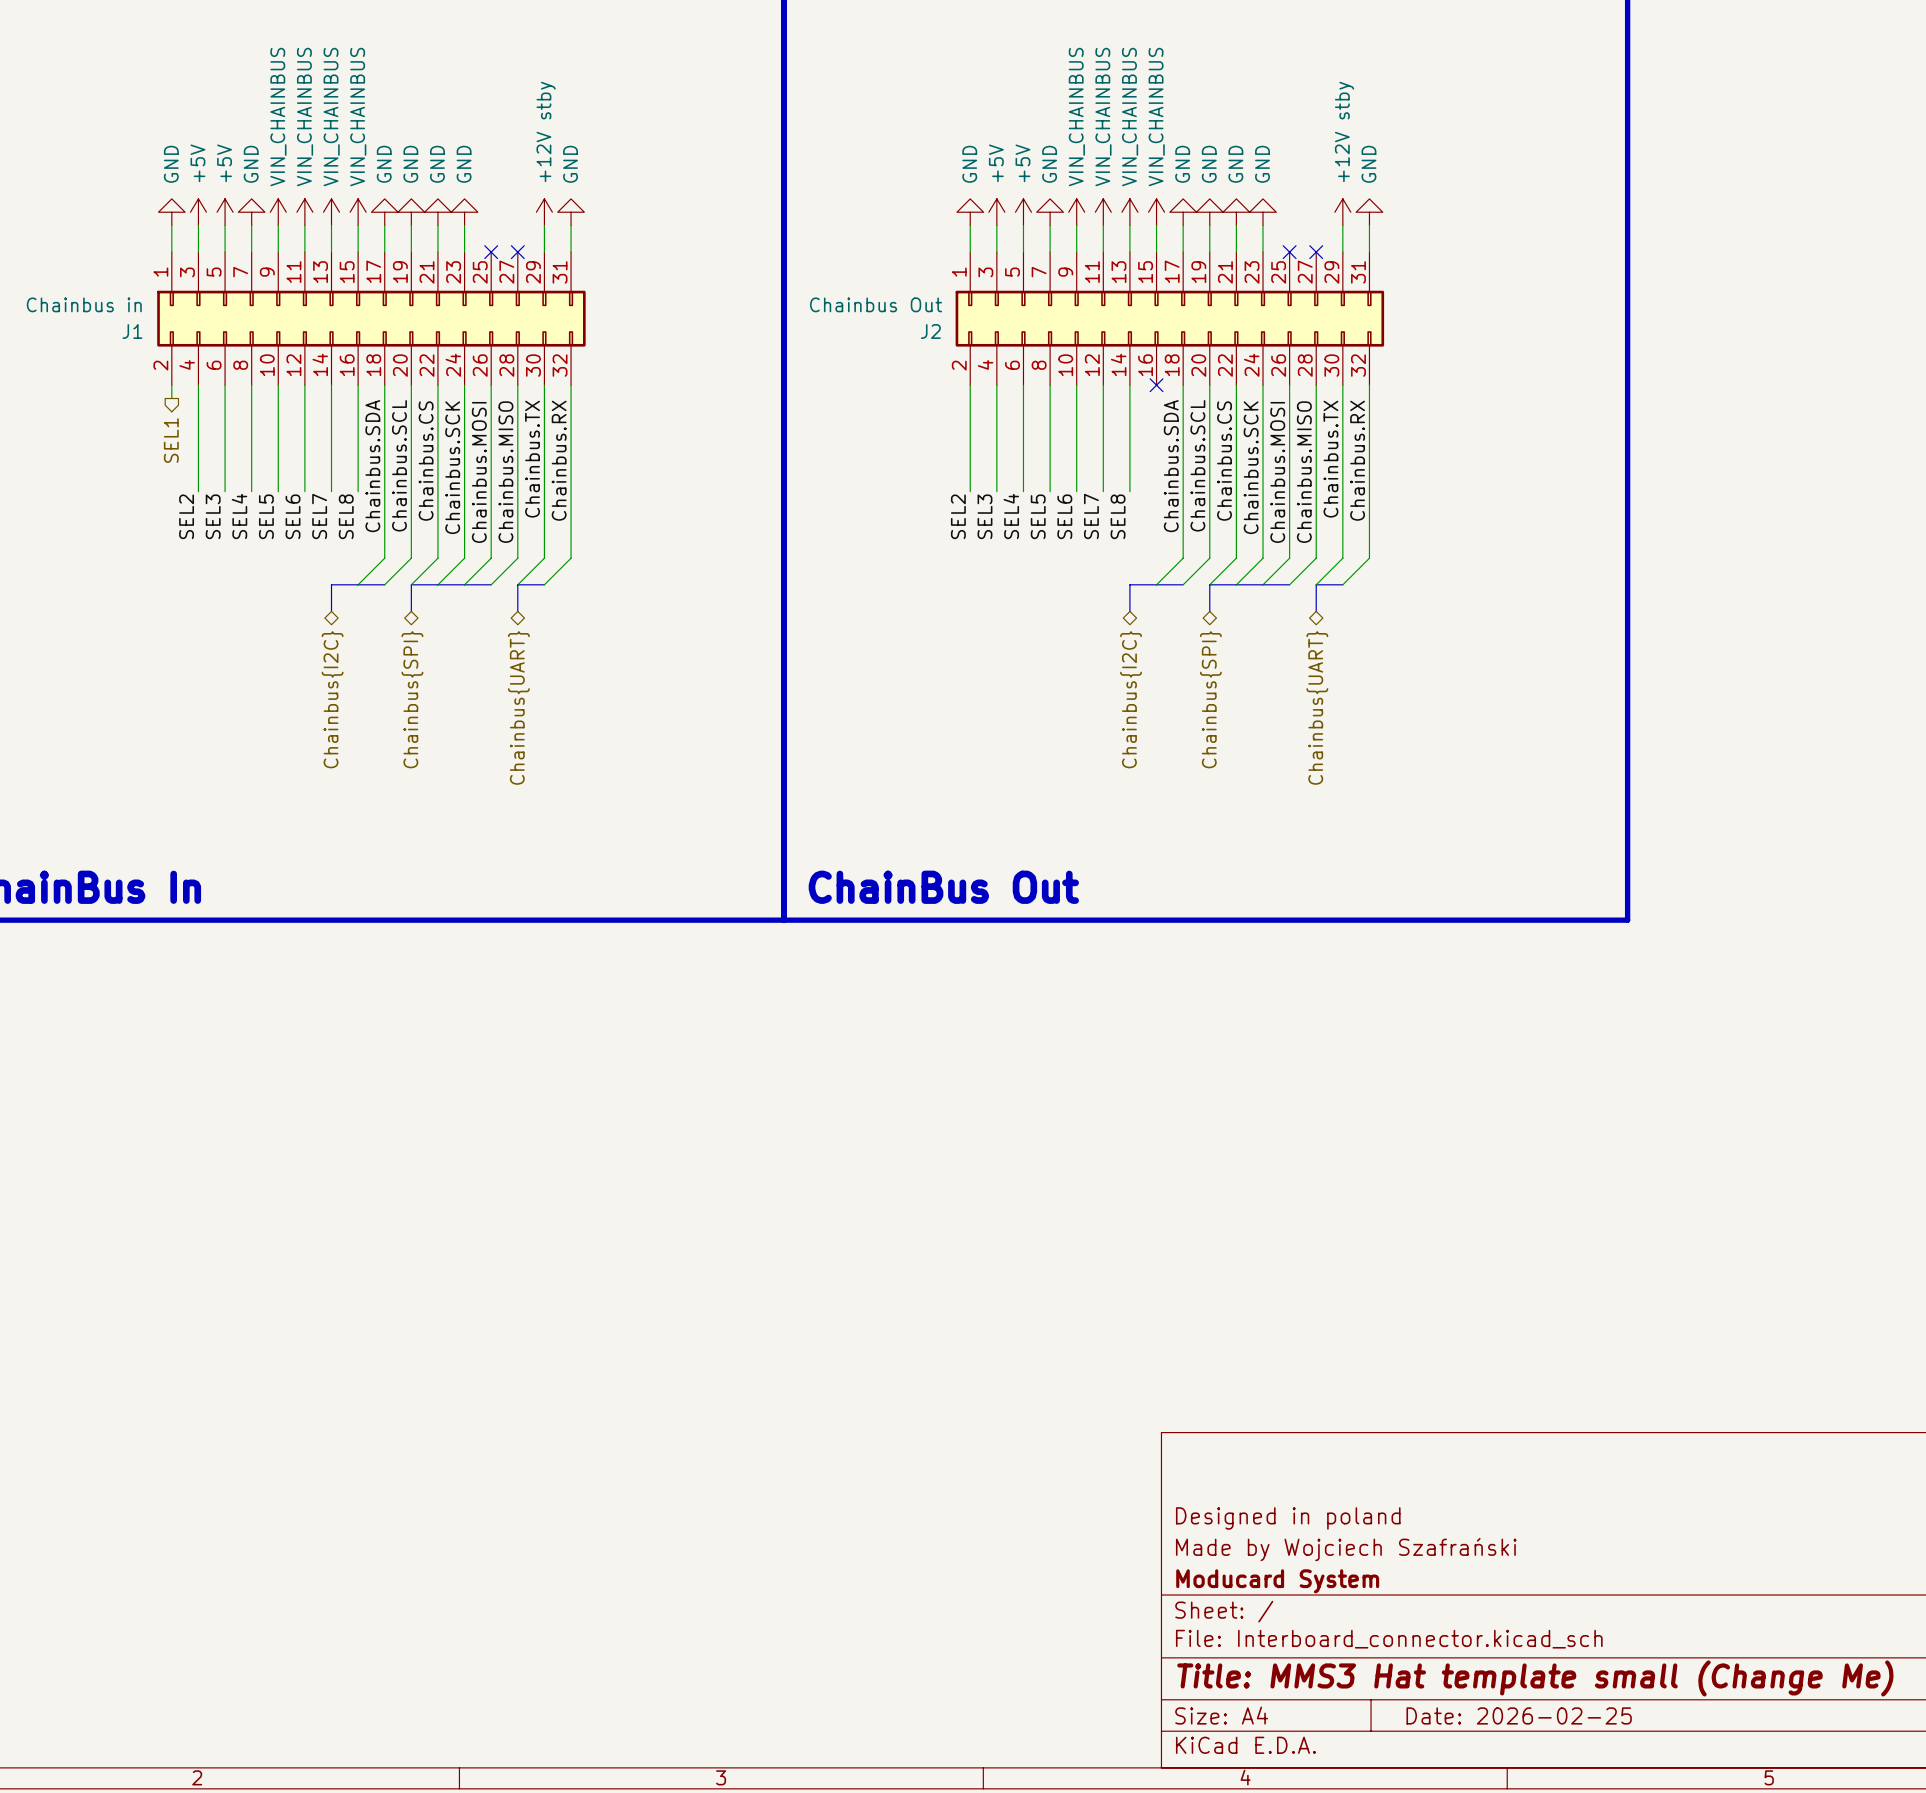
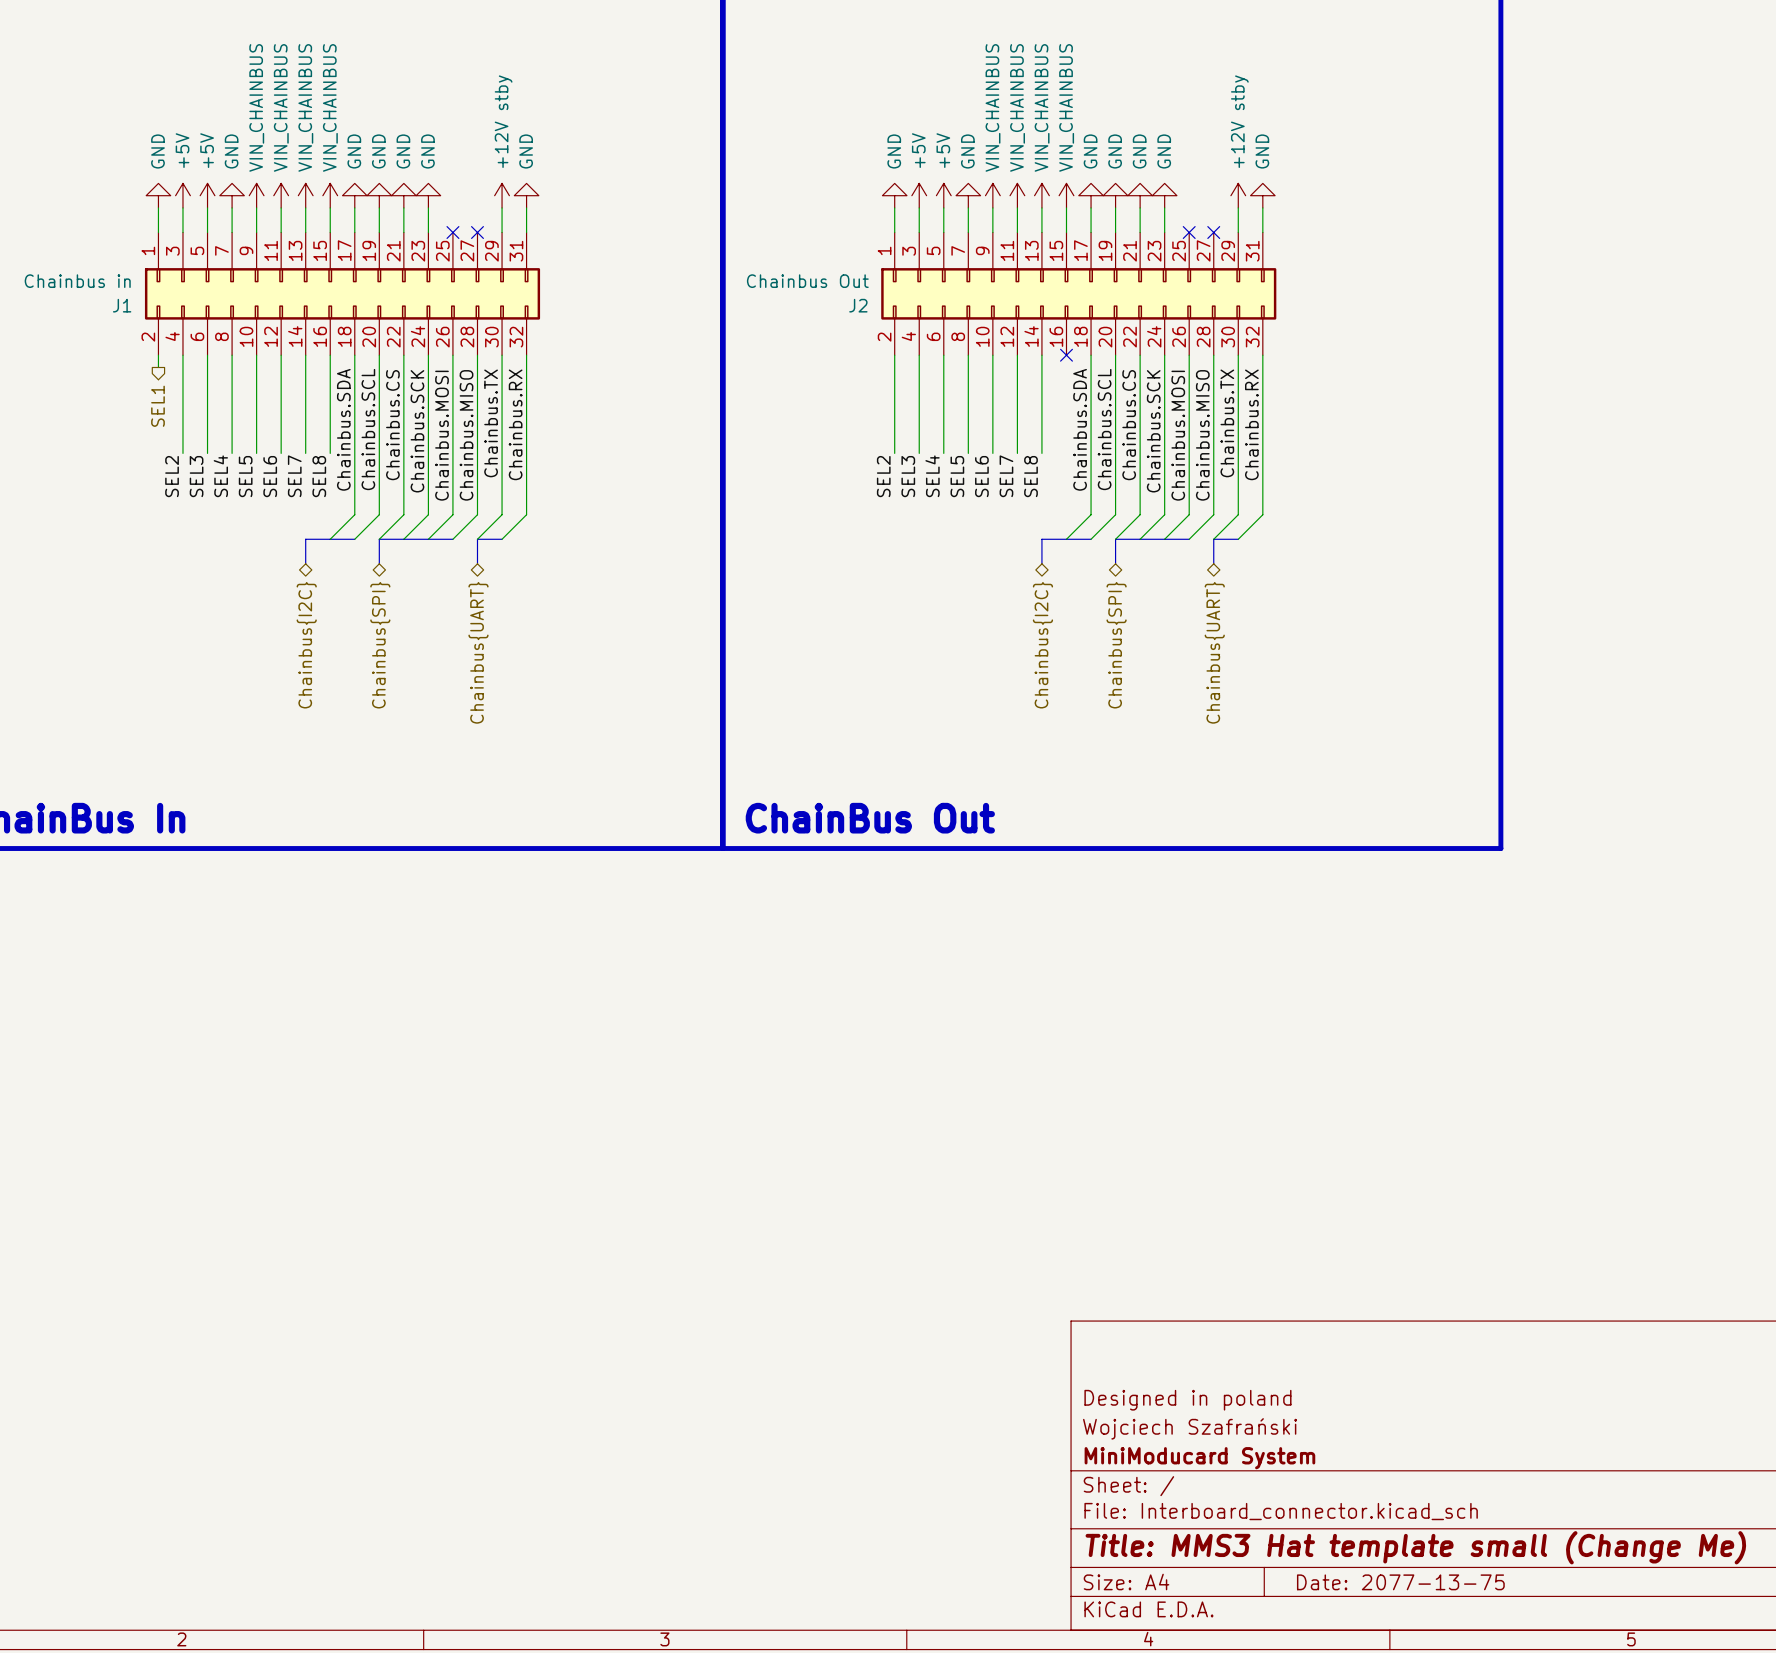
title block: Made by Wojciech Szafrański (1346, 1549) -> Wojciech Szafrański (1190, 1428)
title block: Moducard System (1277, 1581) -> MiniModucard System (1199, 1458)
title block: Date: 2026-02-25 (1519, 1715) -> Date: 2077-13-75 (1400, 1582)

